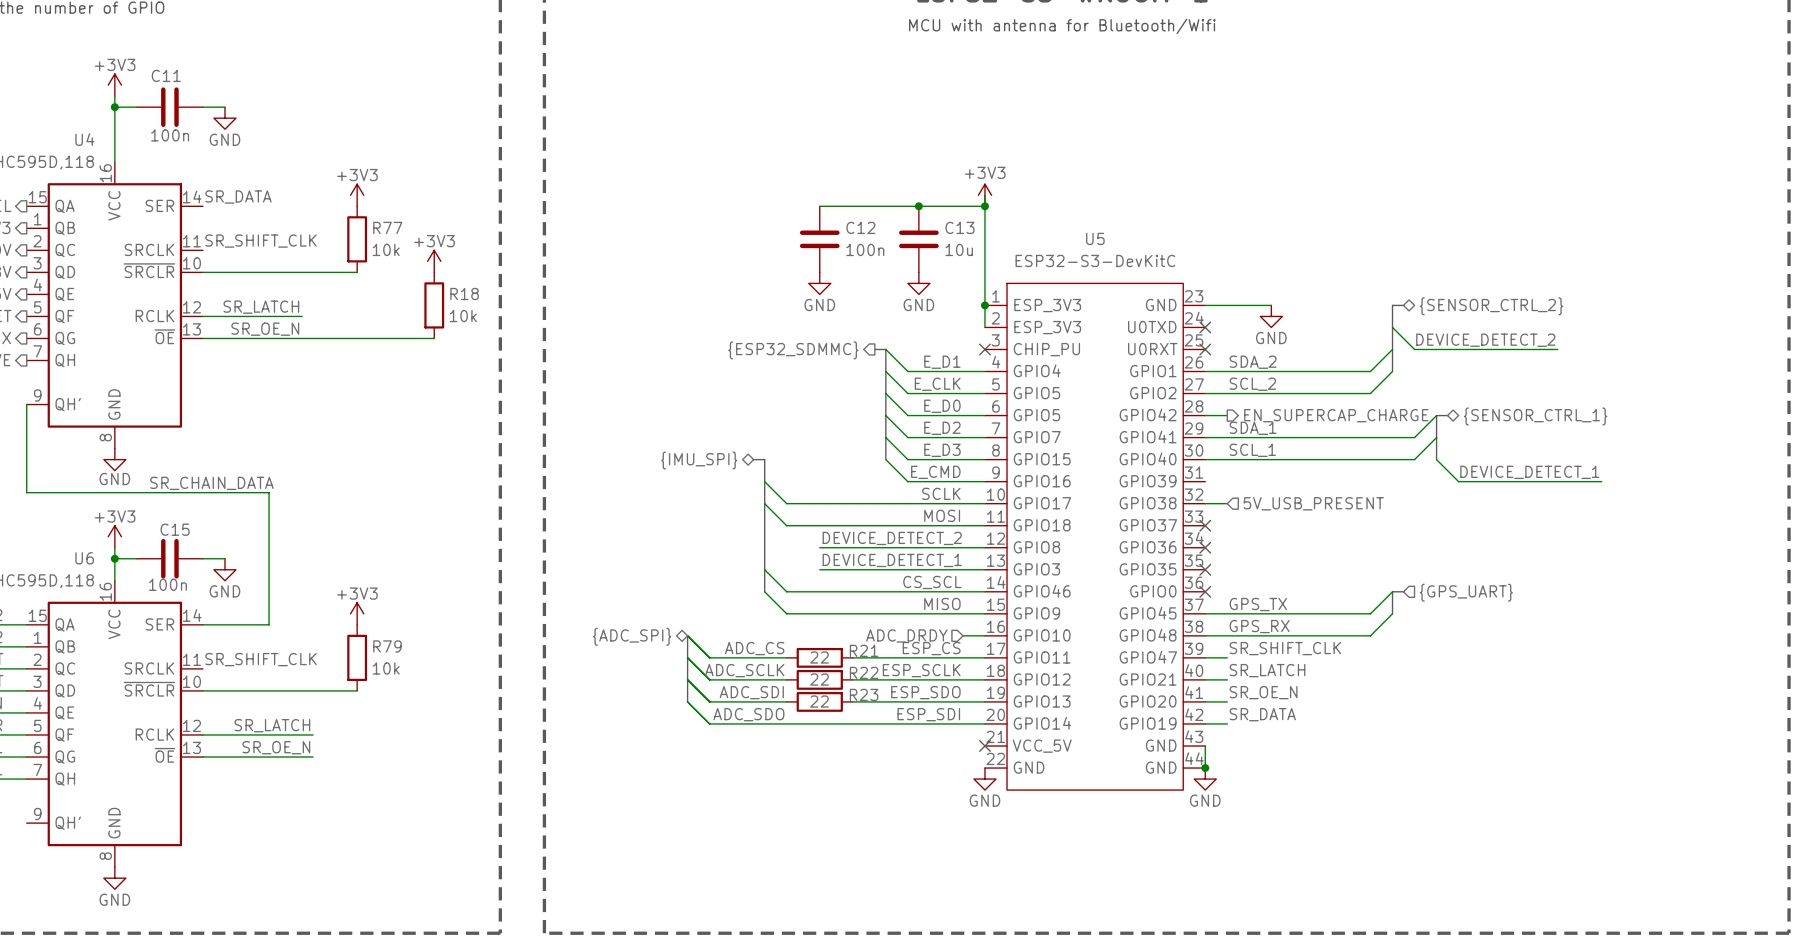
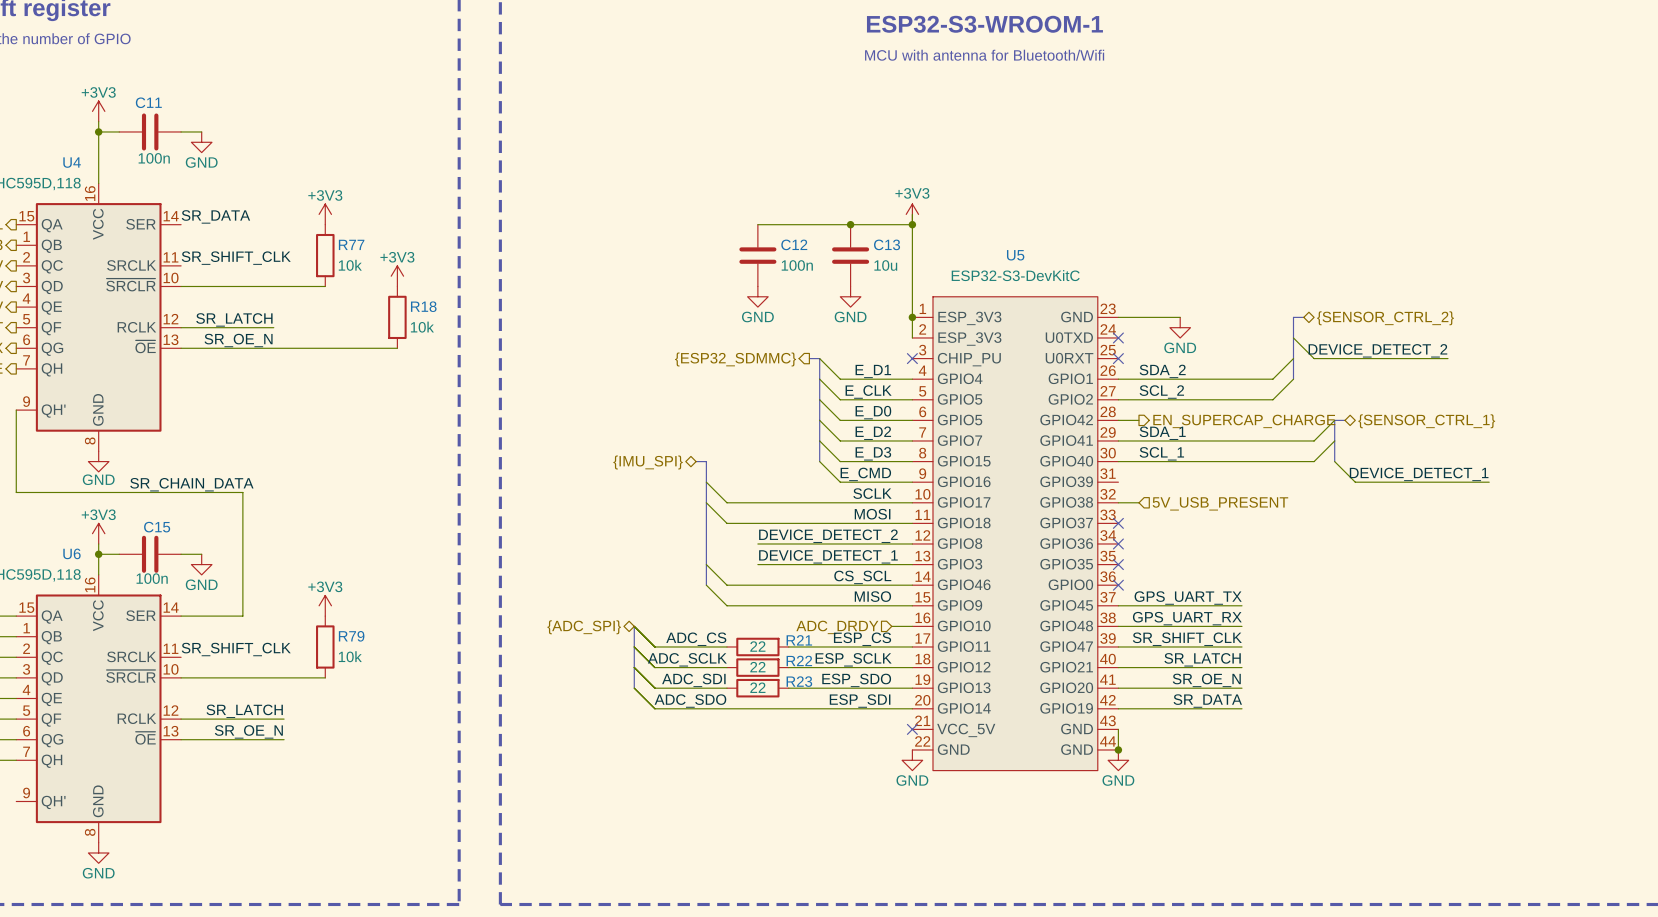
wire: (1392, 591) (1370, 613) (1337, 613) -> none
bus: (1403, 591) (1392, 591) (1392, 613) -> none
hierarchical label: {GPS_UART} (1466, 592) -> none
label: GPS_TX (1258, 604) -> none
label: none -> GPS_UART_TX (1188, 598)
wire: (1392, 613) (1370, 635) (1337, 635) -> none
label: GPS_RX (1259, 626) -> none
label: none -> GPS_UART_RX (1187, 618)
label position: SR_SHIFT_CLK (1285, 648) -> SR_SHIFT_CLK (1187, 639)
wire: none -> (1138, 646) (1241, 646)
label position: SR_LATCH (1267, 670) -> SR_LATCH (1202, 659)
wire: none -> (1138, 667) (1241, 667)
label position: SR_OE_N (1263, 692) -> SR_OE_N (1206, 680)
wire: none -> (1138, 688) (1241, 688)
label position: SR_DATA (1262, 714) -> SR_DATA (1207, 701)
wire: none -> (1138, 708) (1241, 708)

